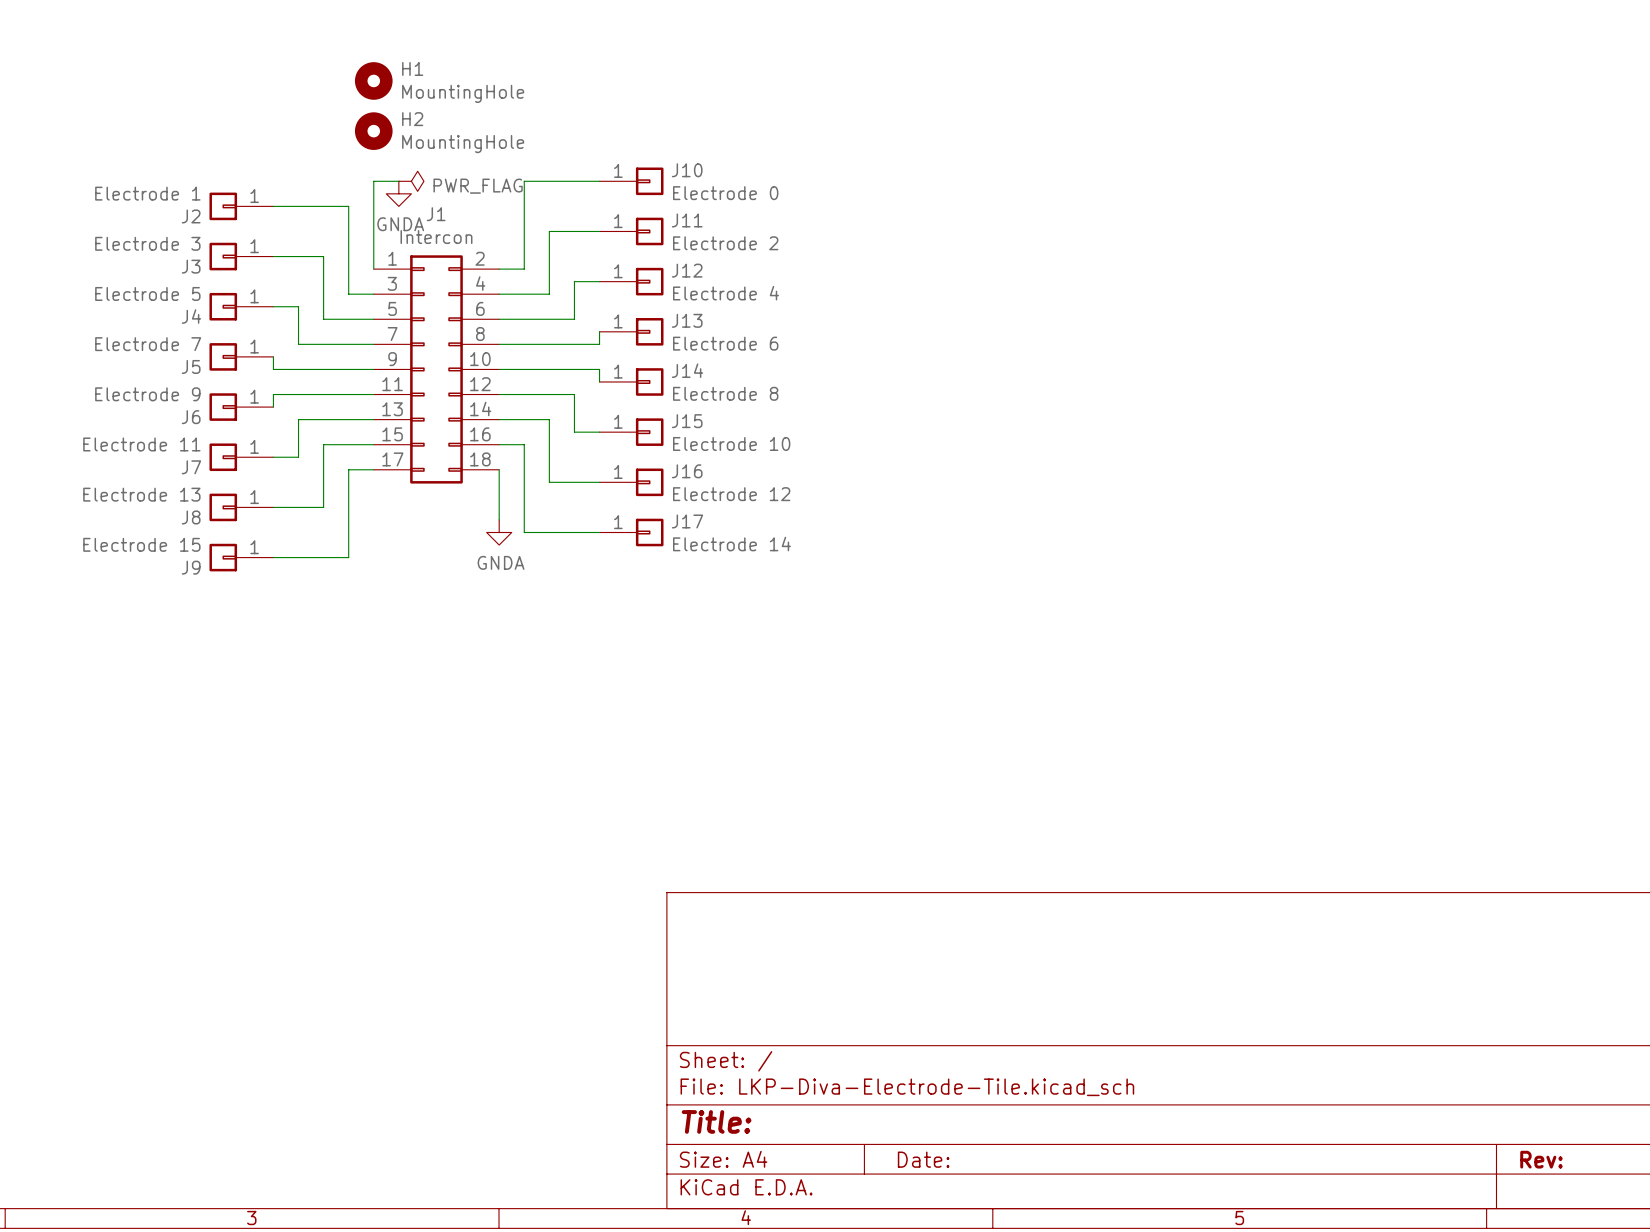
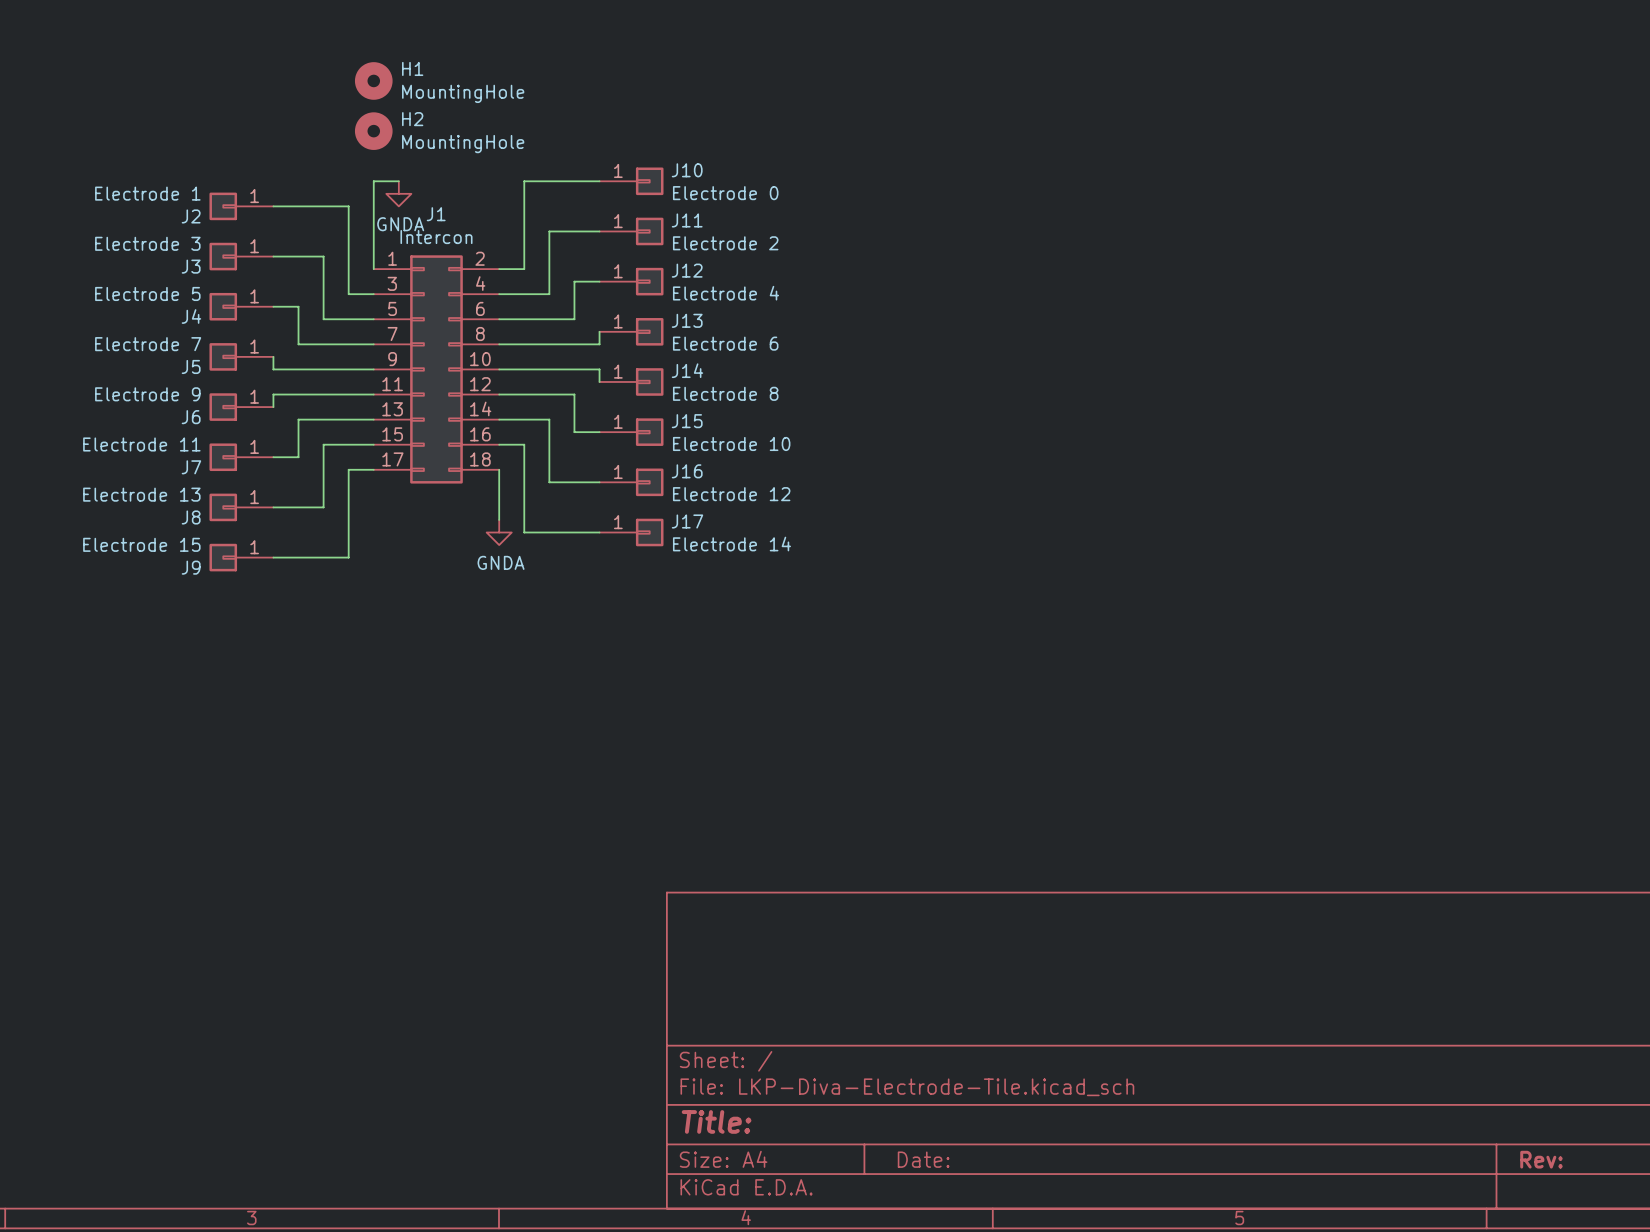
power symbol: PWR_FLAG (411, 181) -> none

